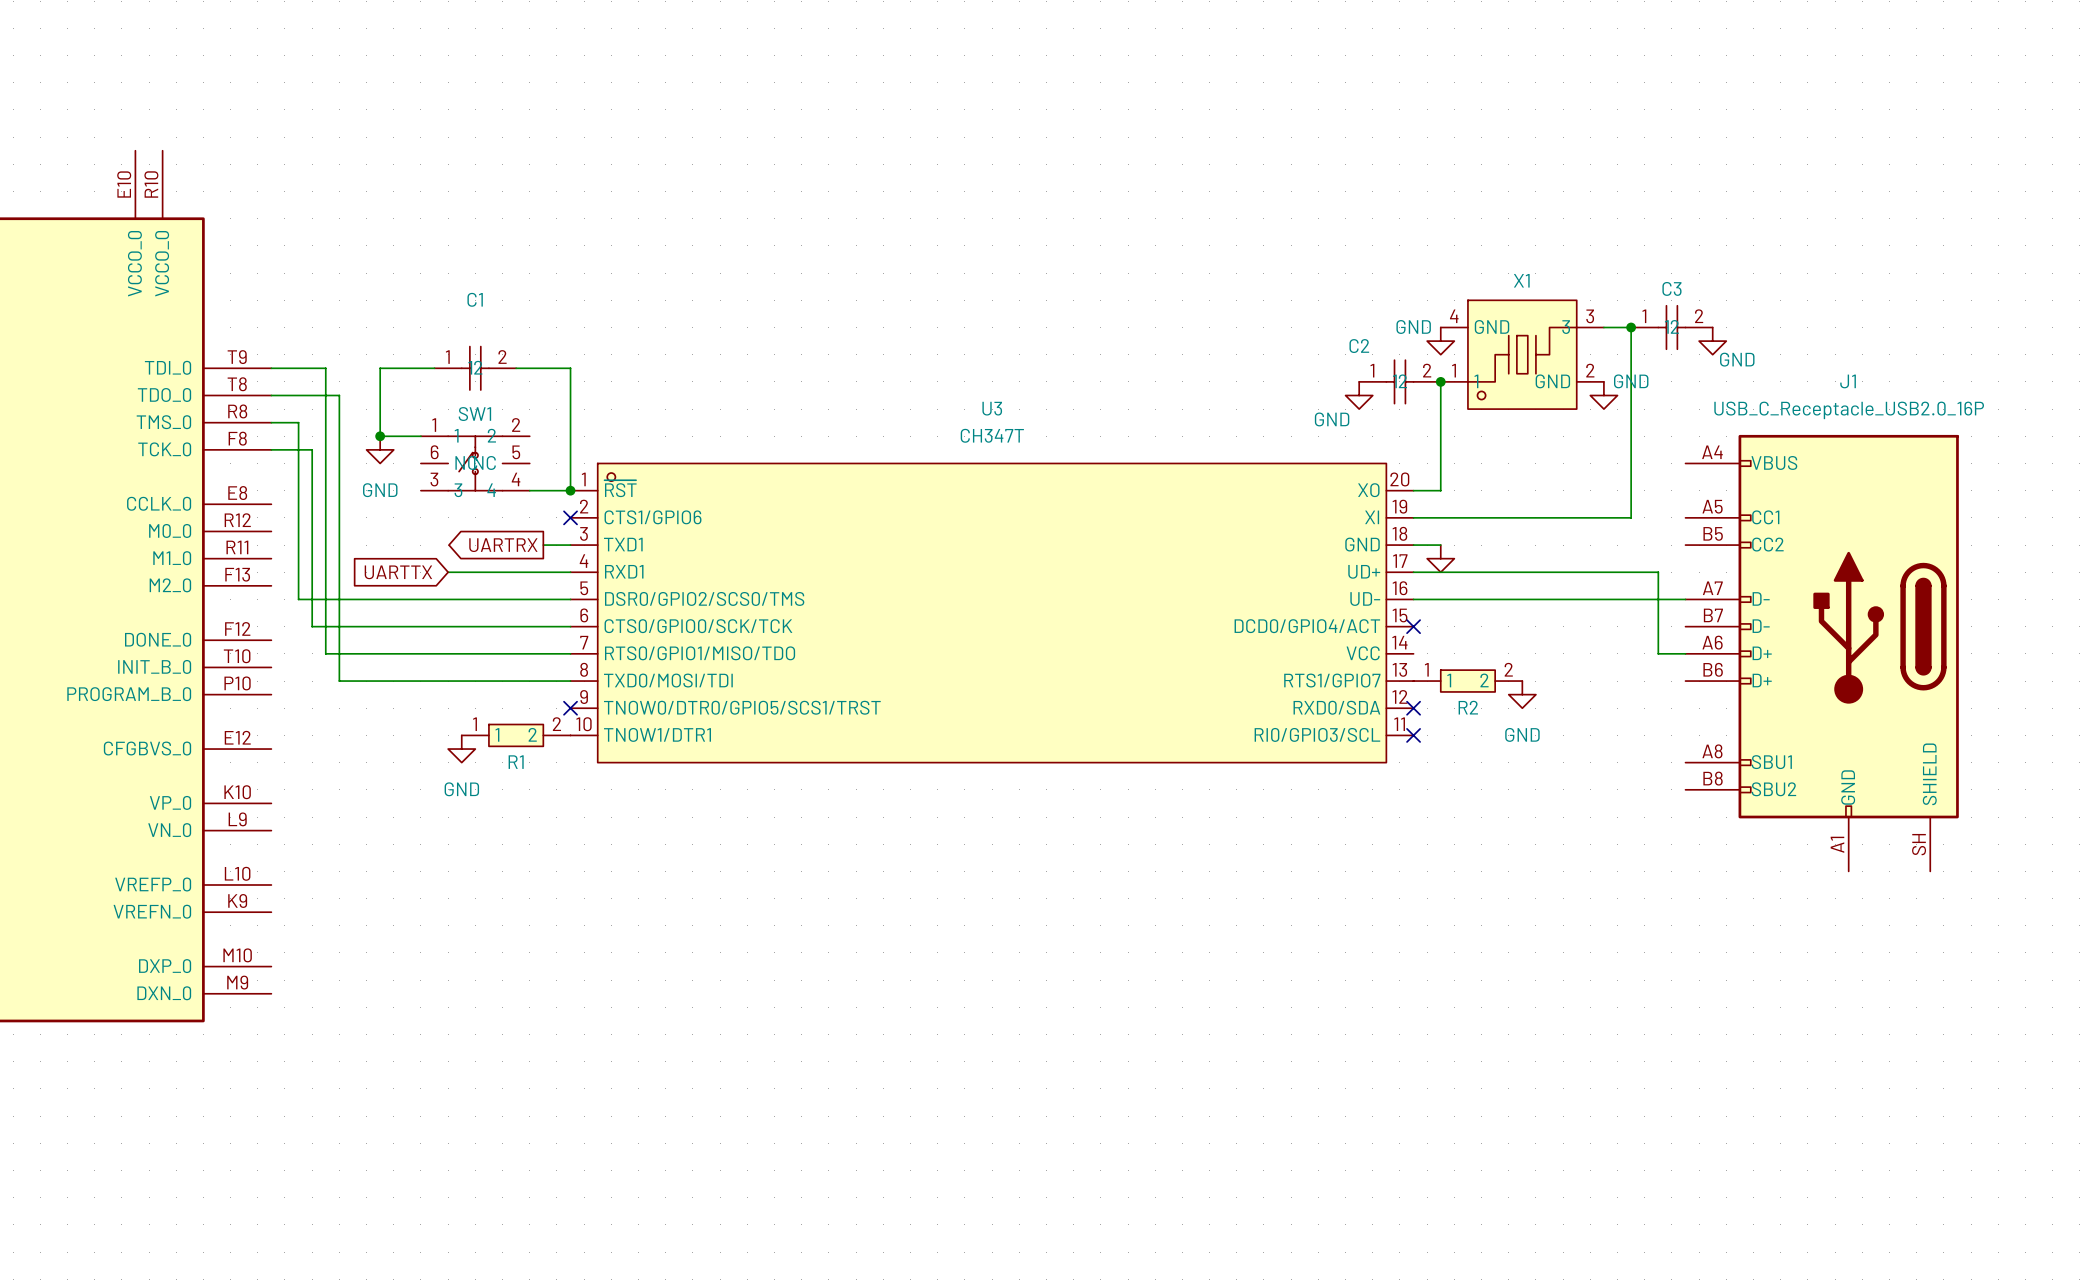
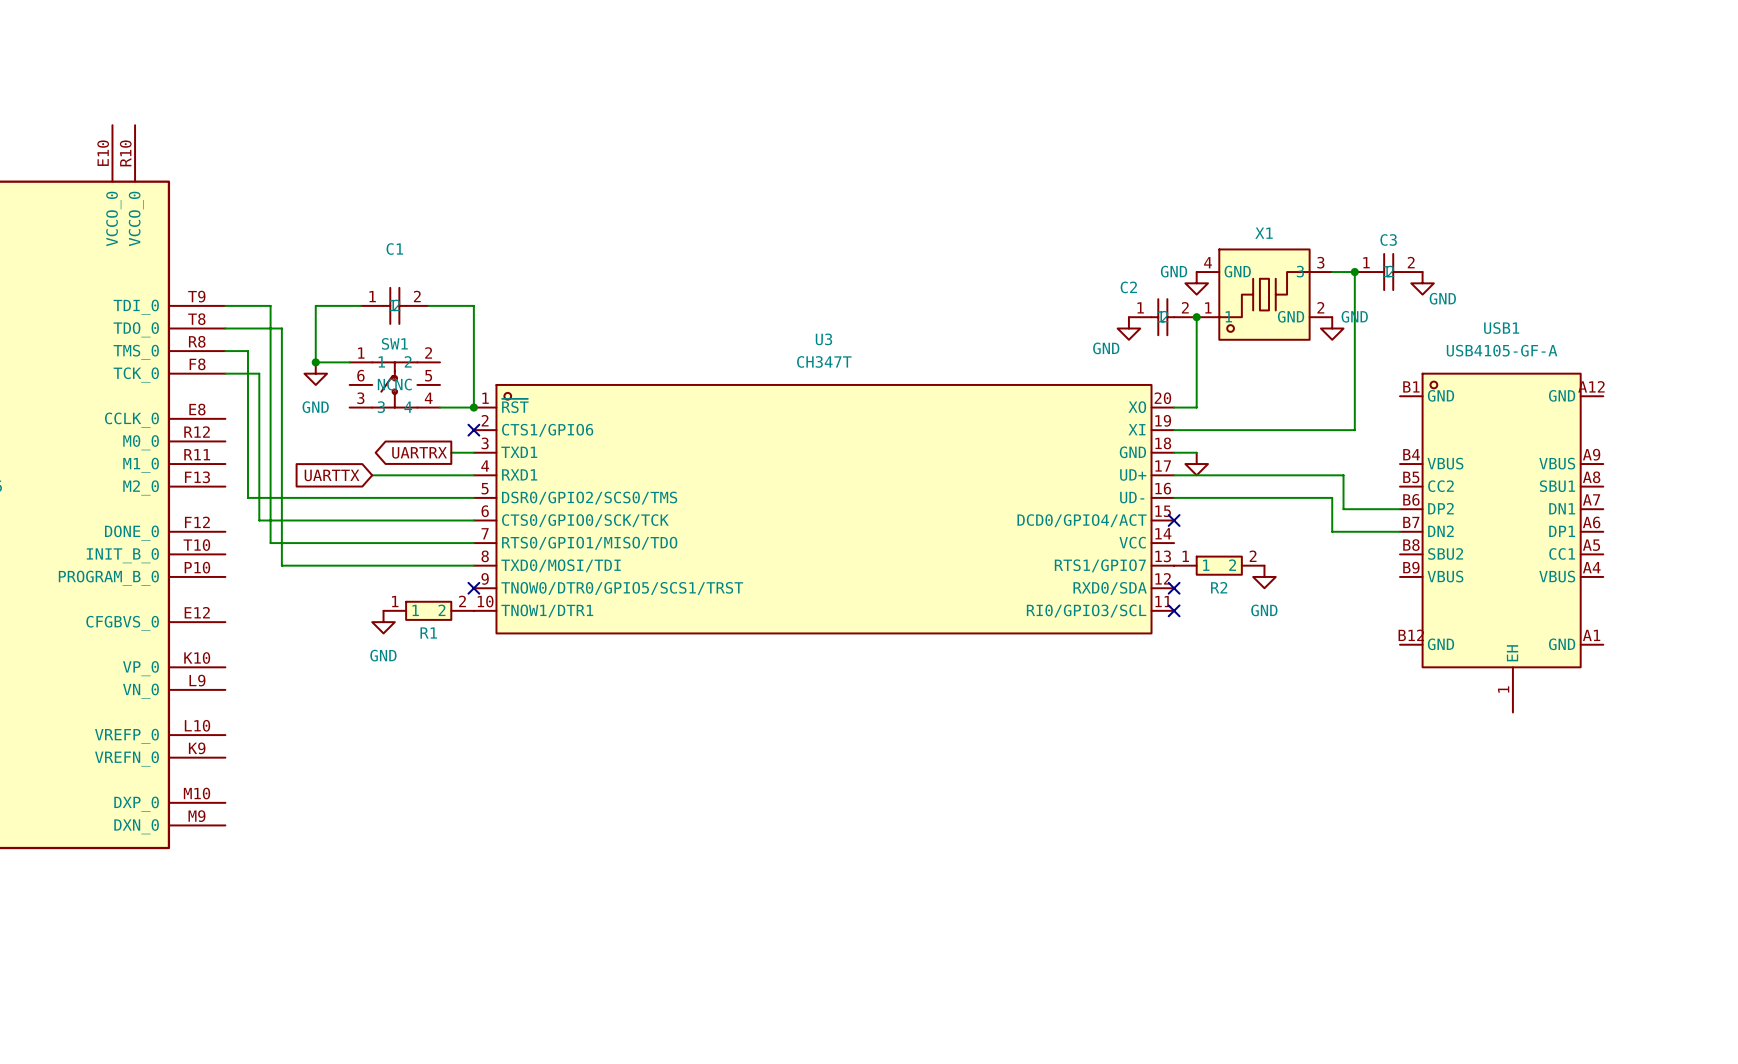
wire: (1617, 572) (1658, 572) (1658, 653) (1685, 653) -> (1343, 475) (1343, 509) (1399, 509)
wire: (1603, 599) (1685, 599) -> (1332, 497) (1332, 531) (1399, 531)
USB1: none -> USB4105-GF-A (1501, 543)
J1: USB_C_Receptacle_USB2.0_16P (1822, 653) -> none

